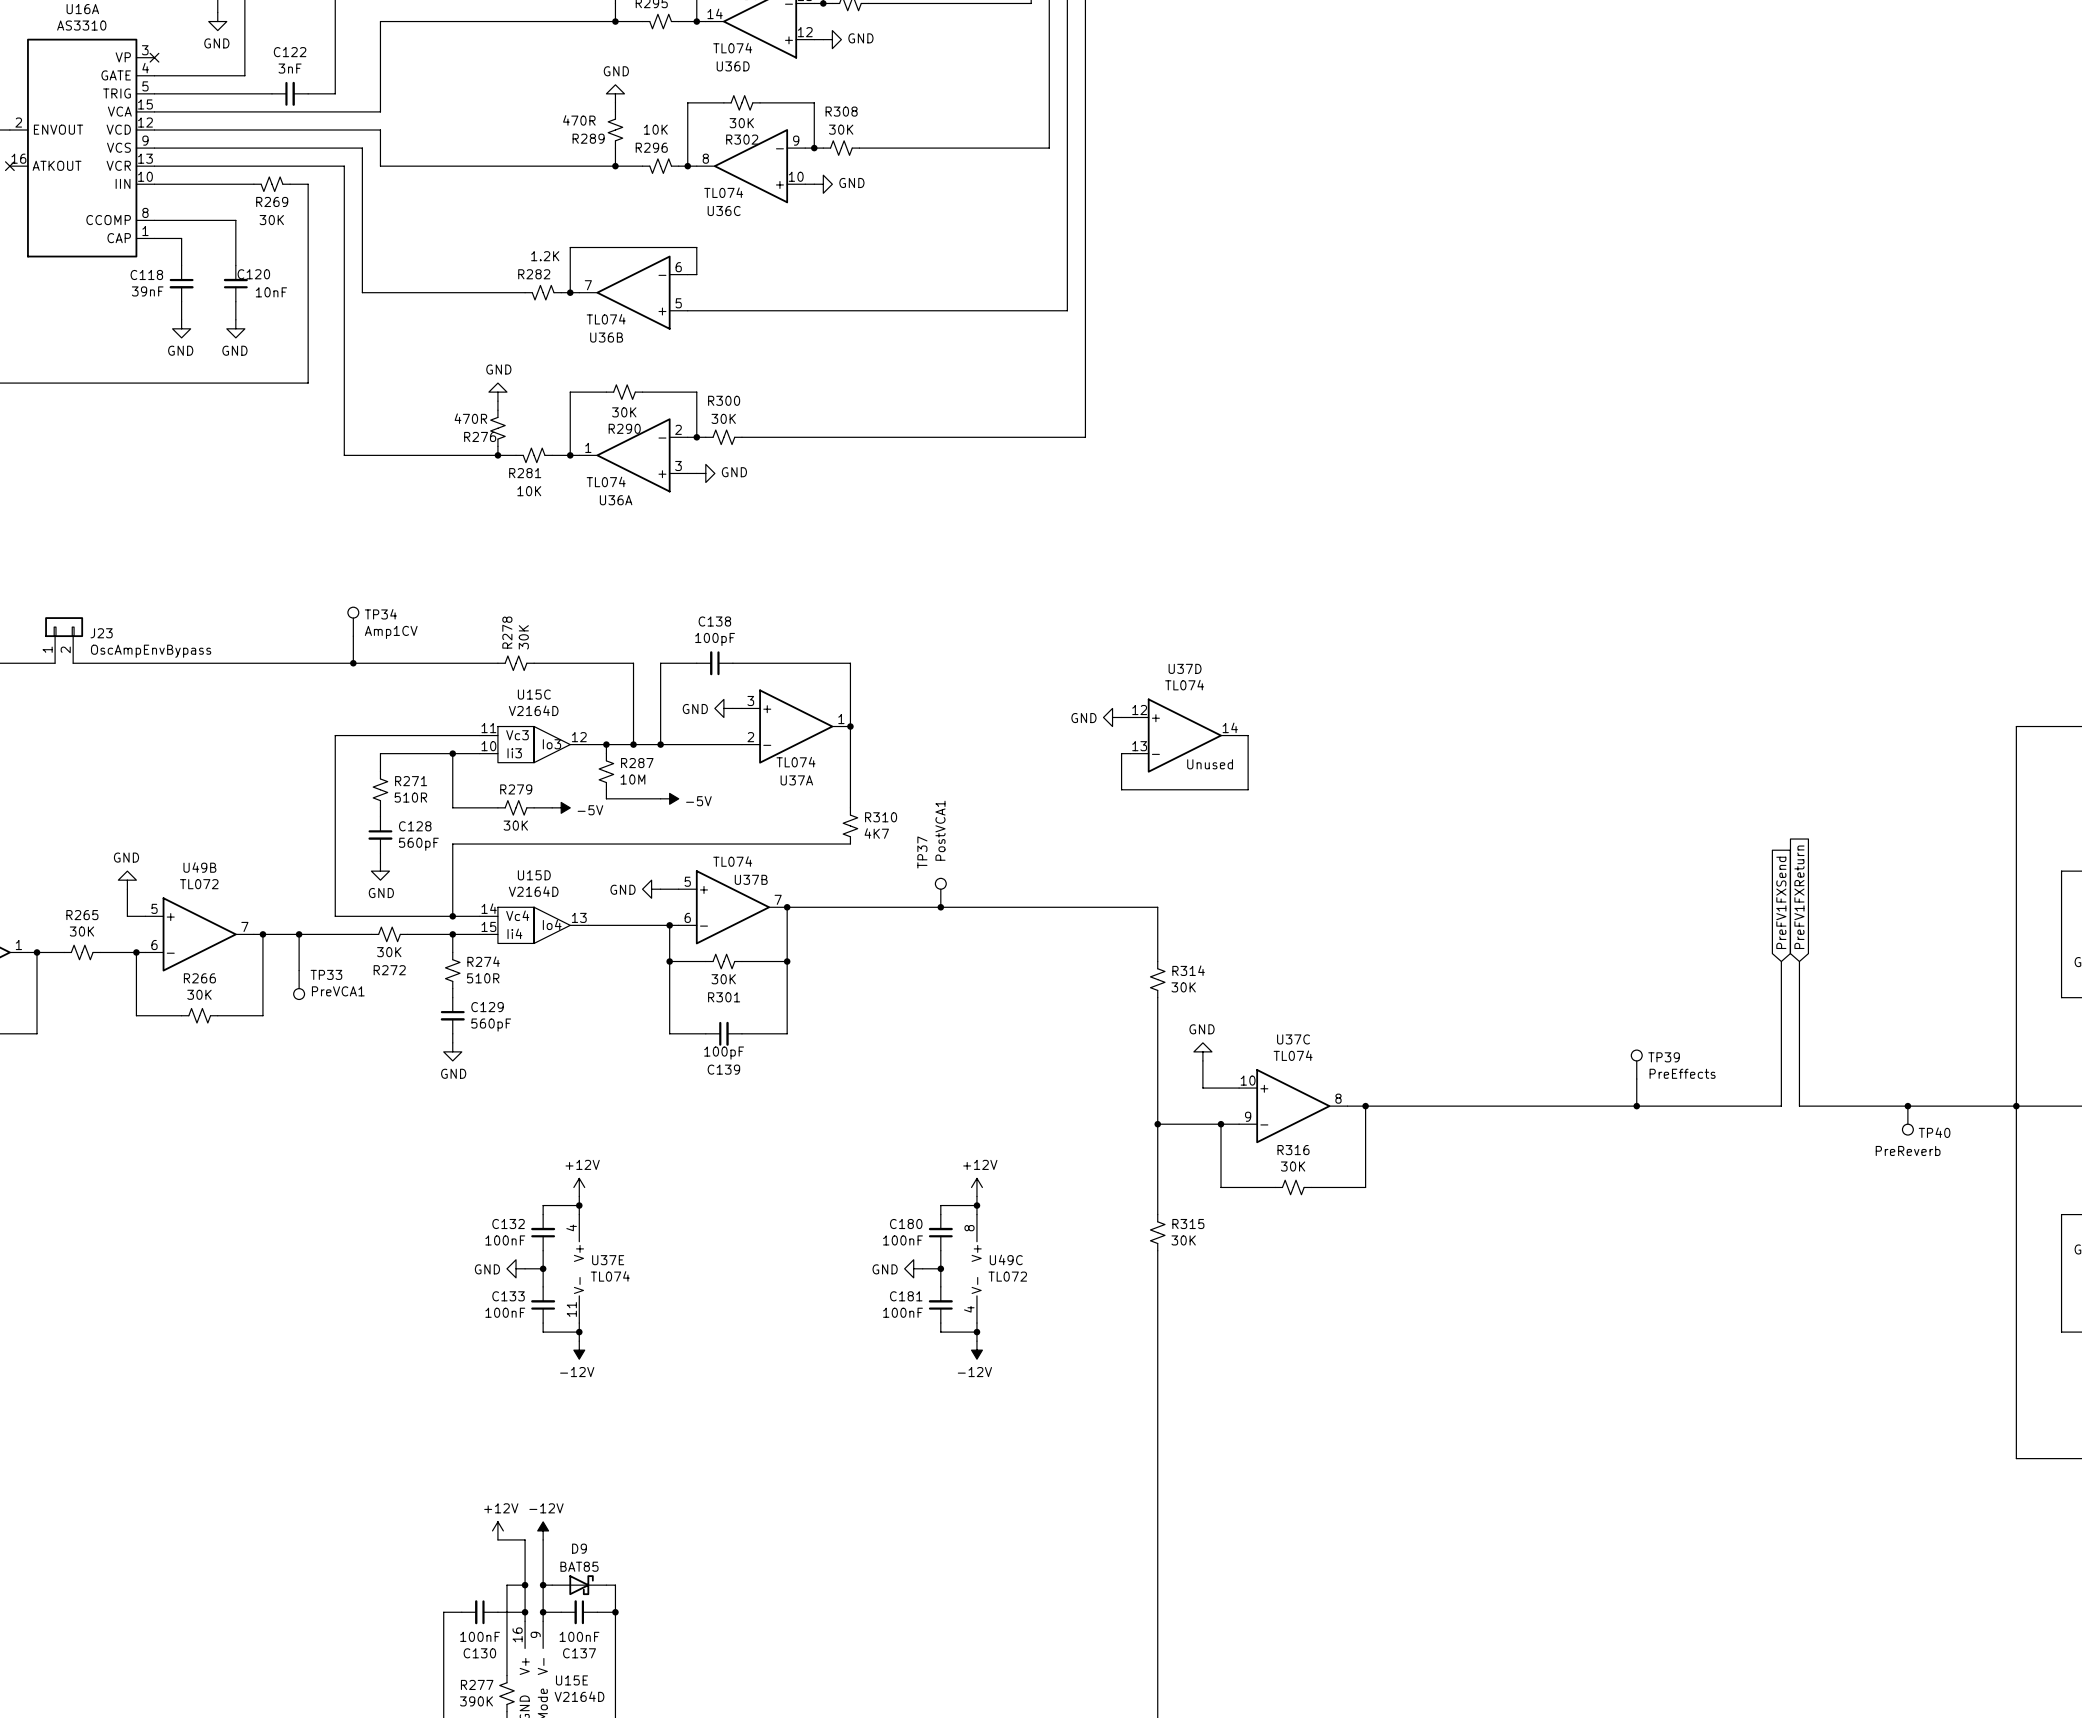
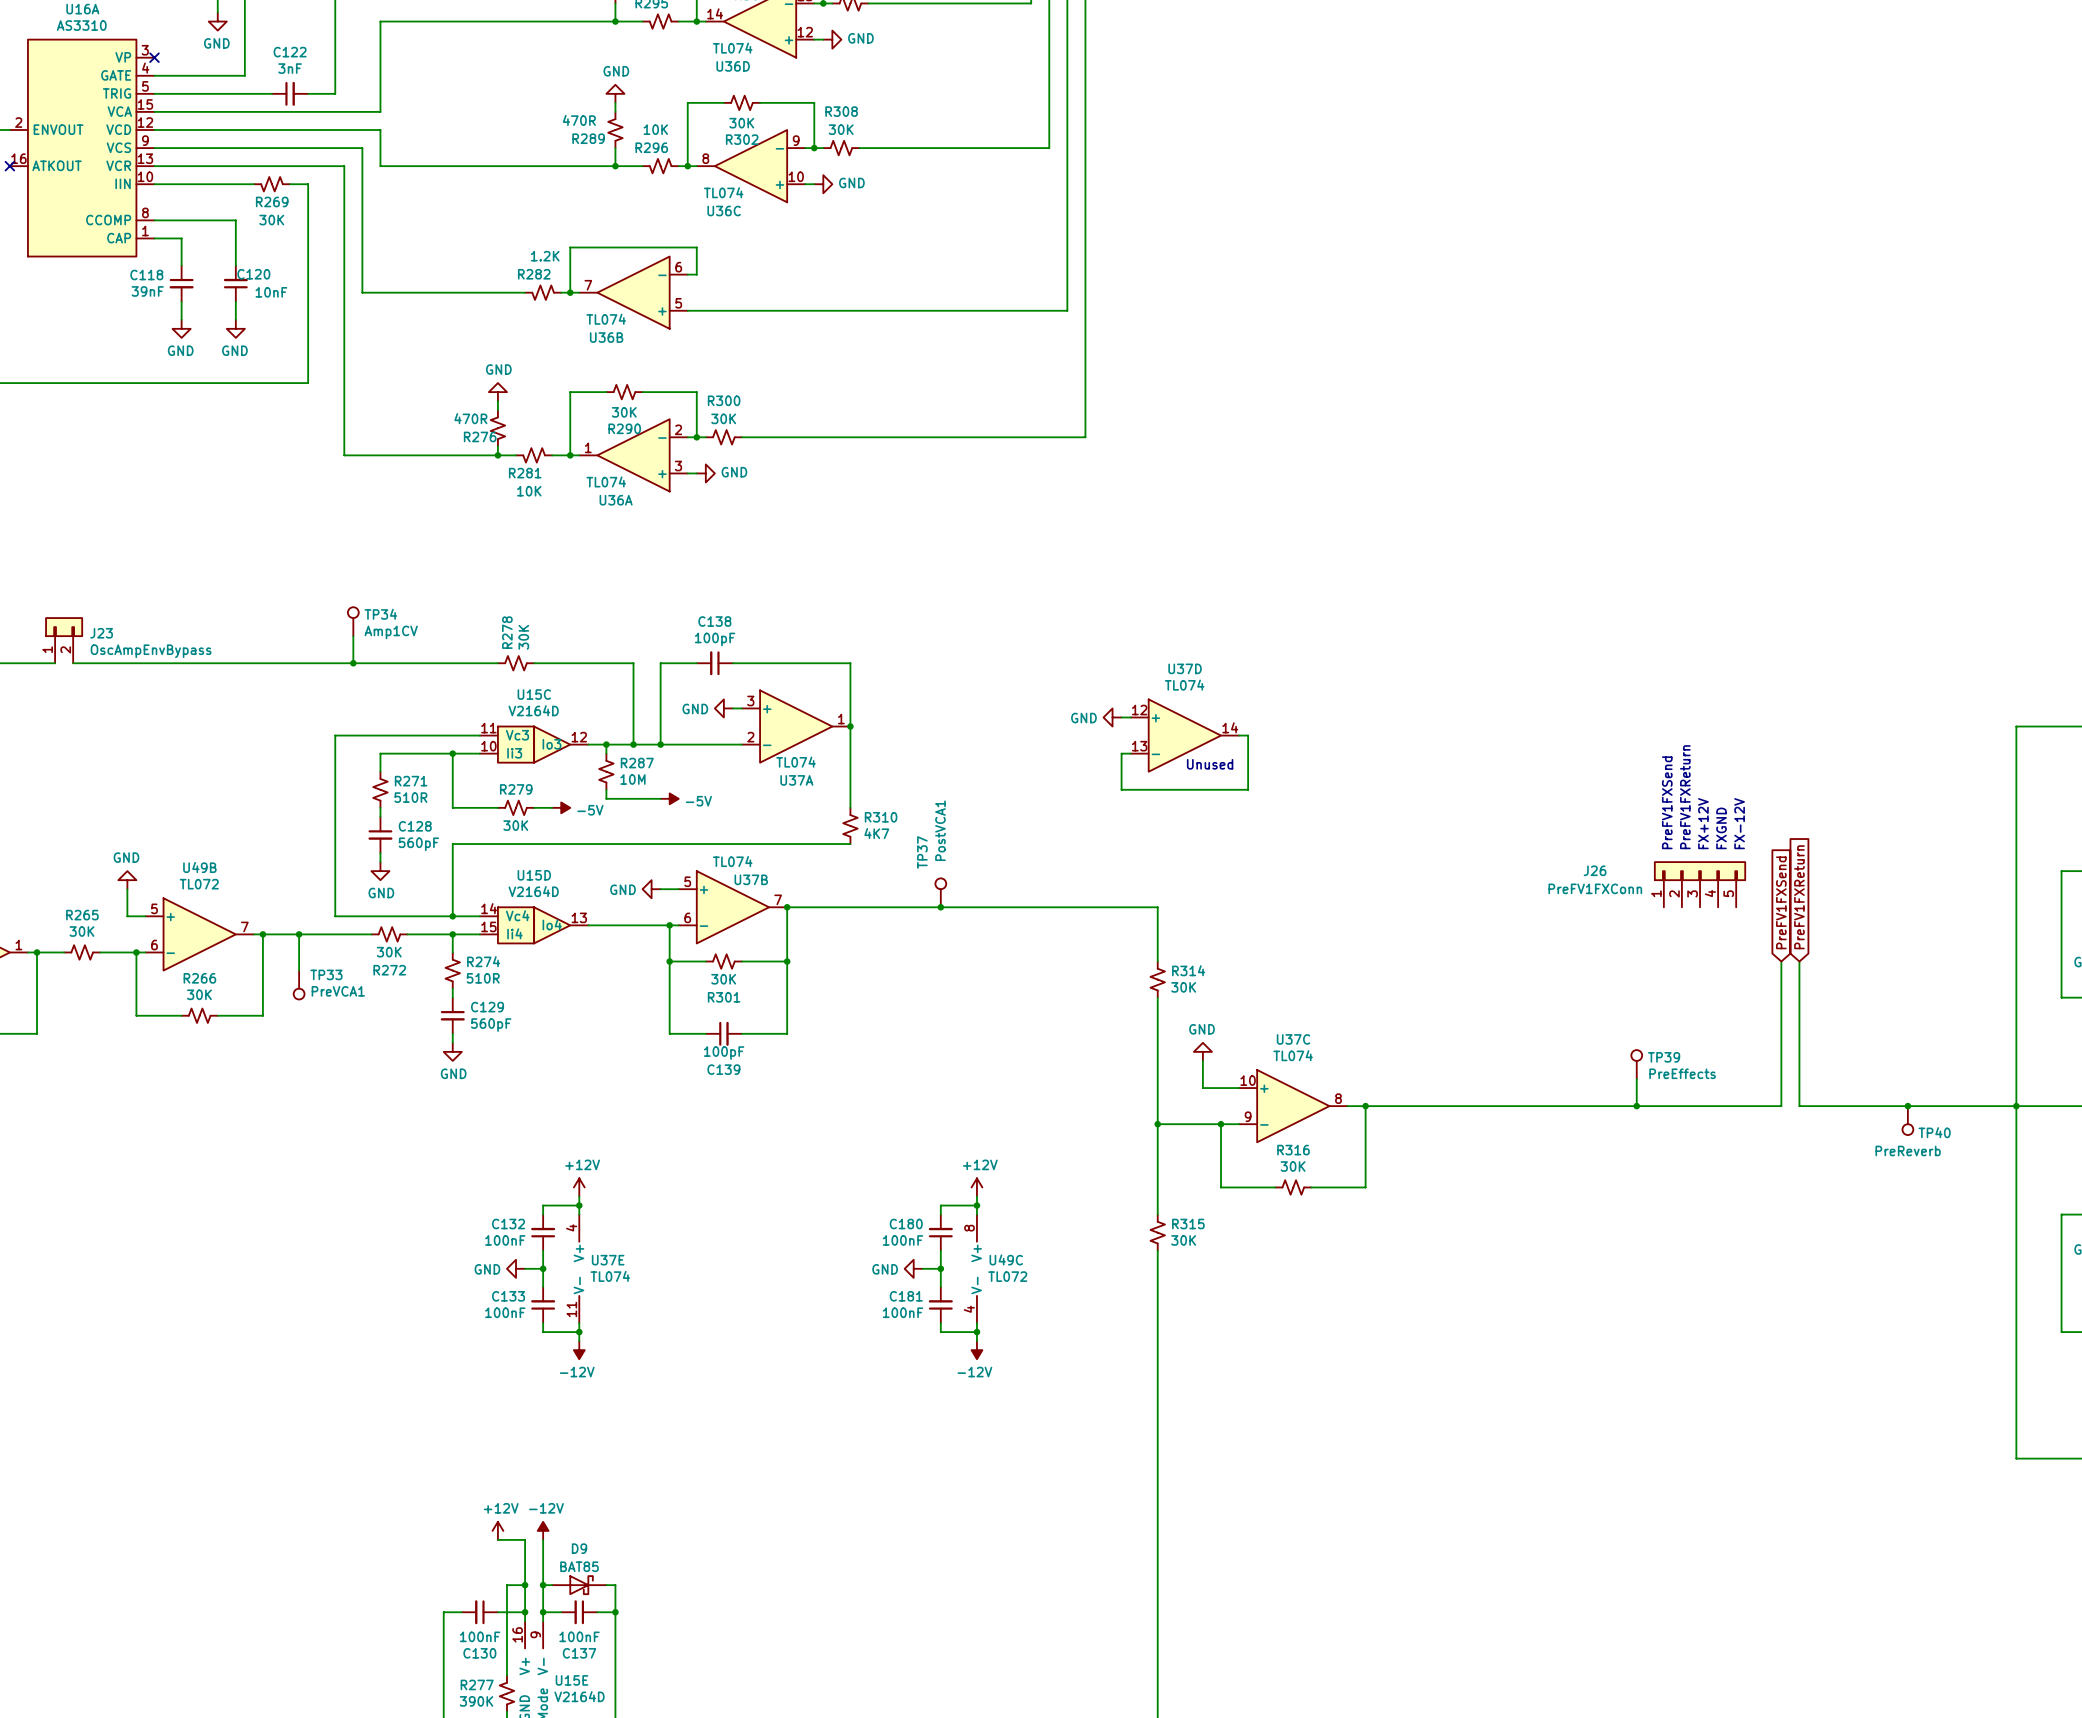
text: none -> PreFV1FXReturn (1685, 797)
text: none -> PreFV1FXSend (1667, 802)
text: none -> FX+12V (1703, 823)
text: none -> FX-12V (1739, 823)
text: none -> FXGND (1721, 828)
J26: none -> PreFV1FXConn (1700, 884)

